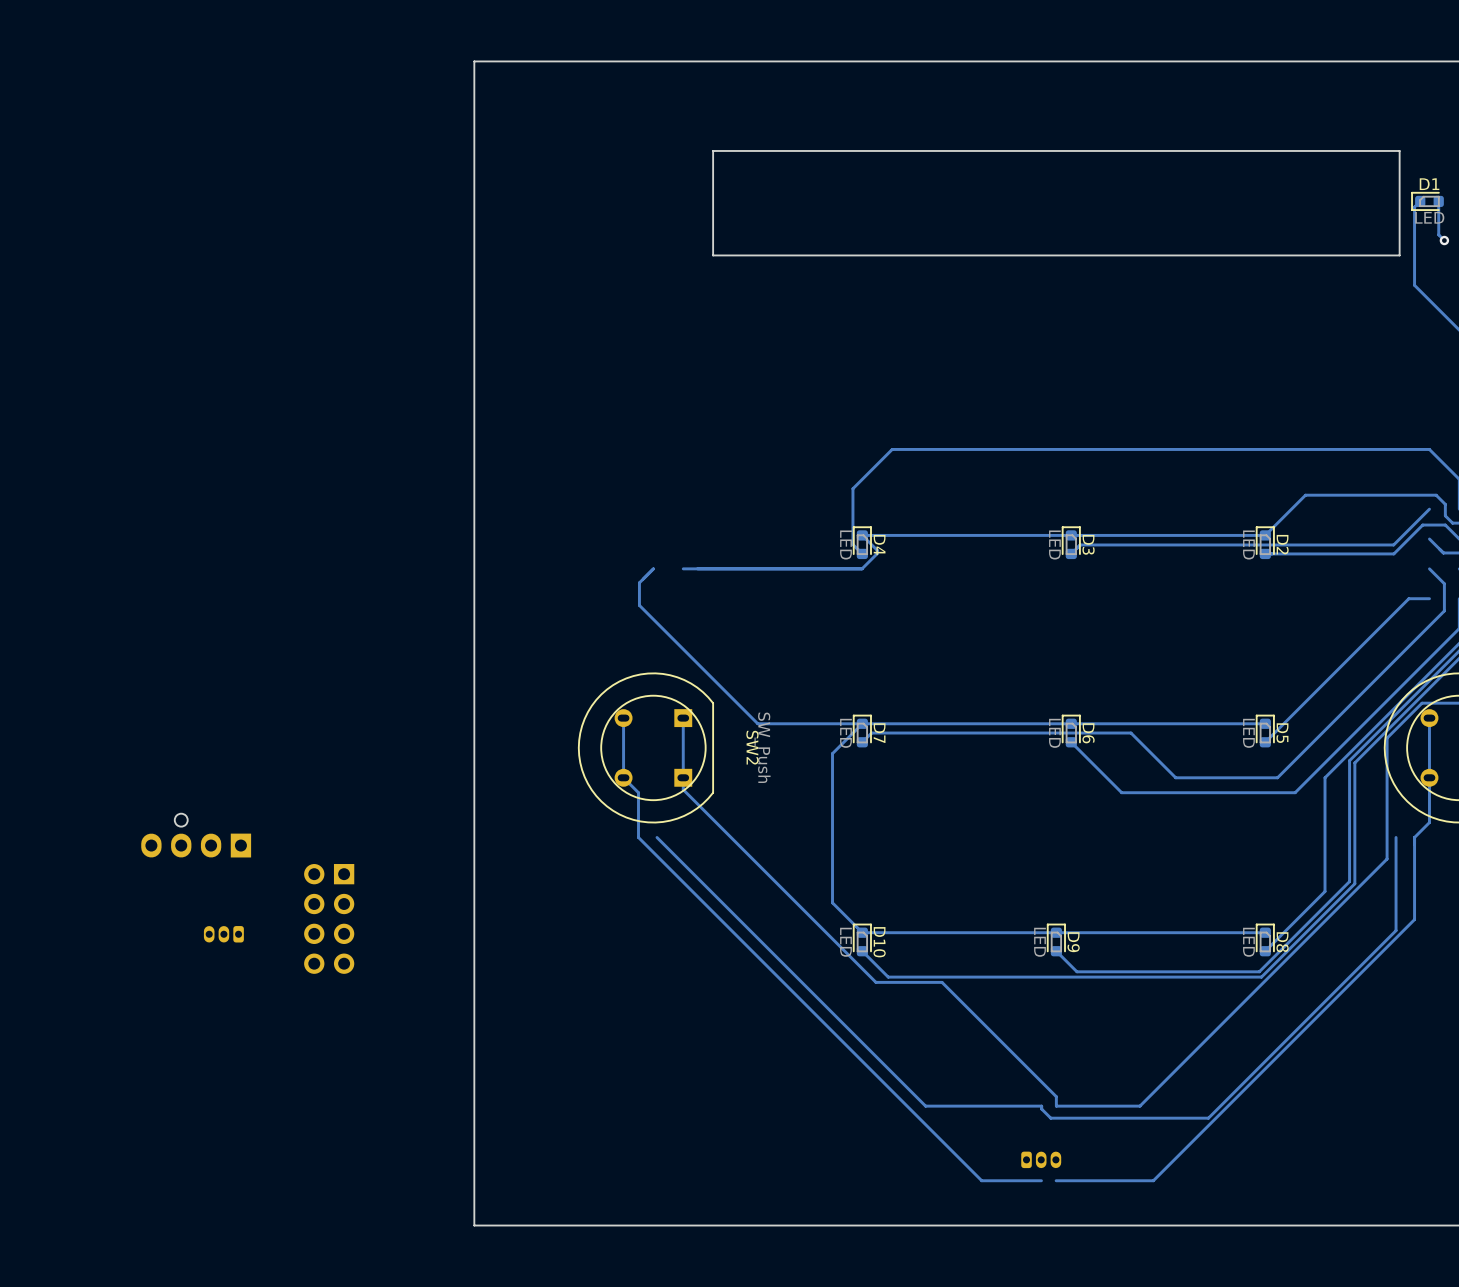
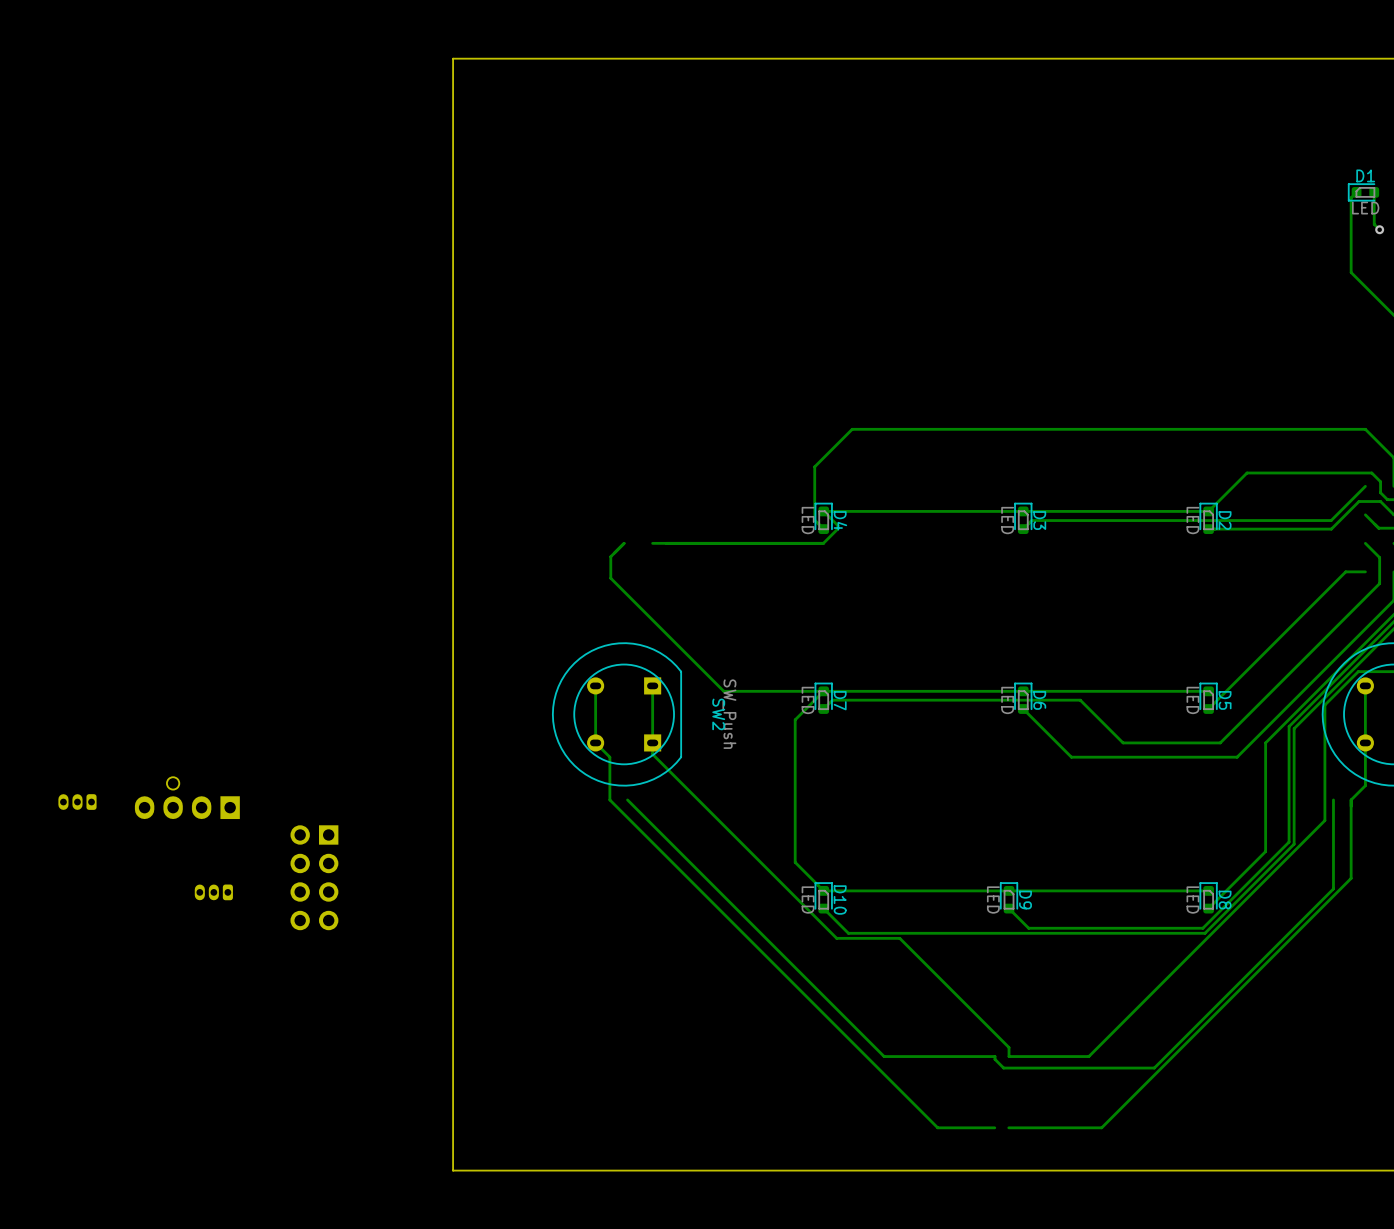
board edge: (1399, 150) (1399, 255) (713, 255) (713, 150) (1399, 150) -> none
part: none -> (77, 802)
part: (1041, 1159) -> none

